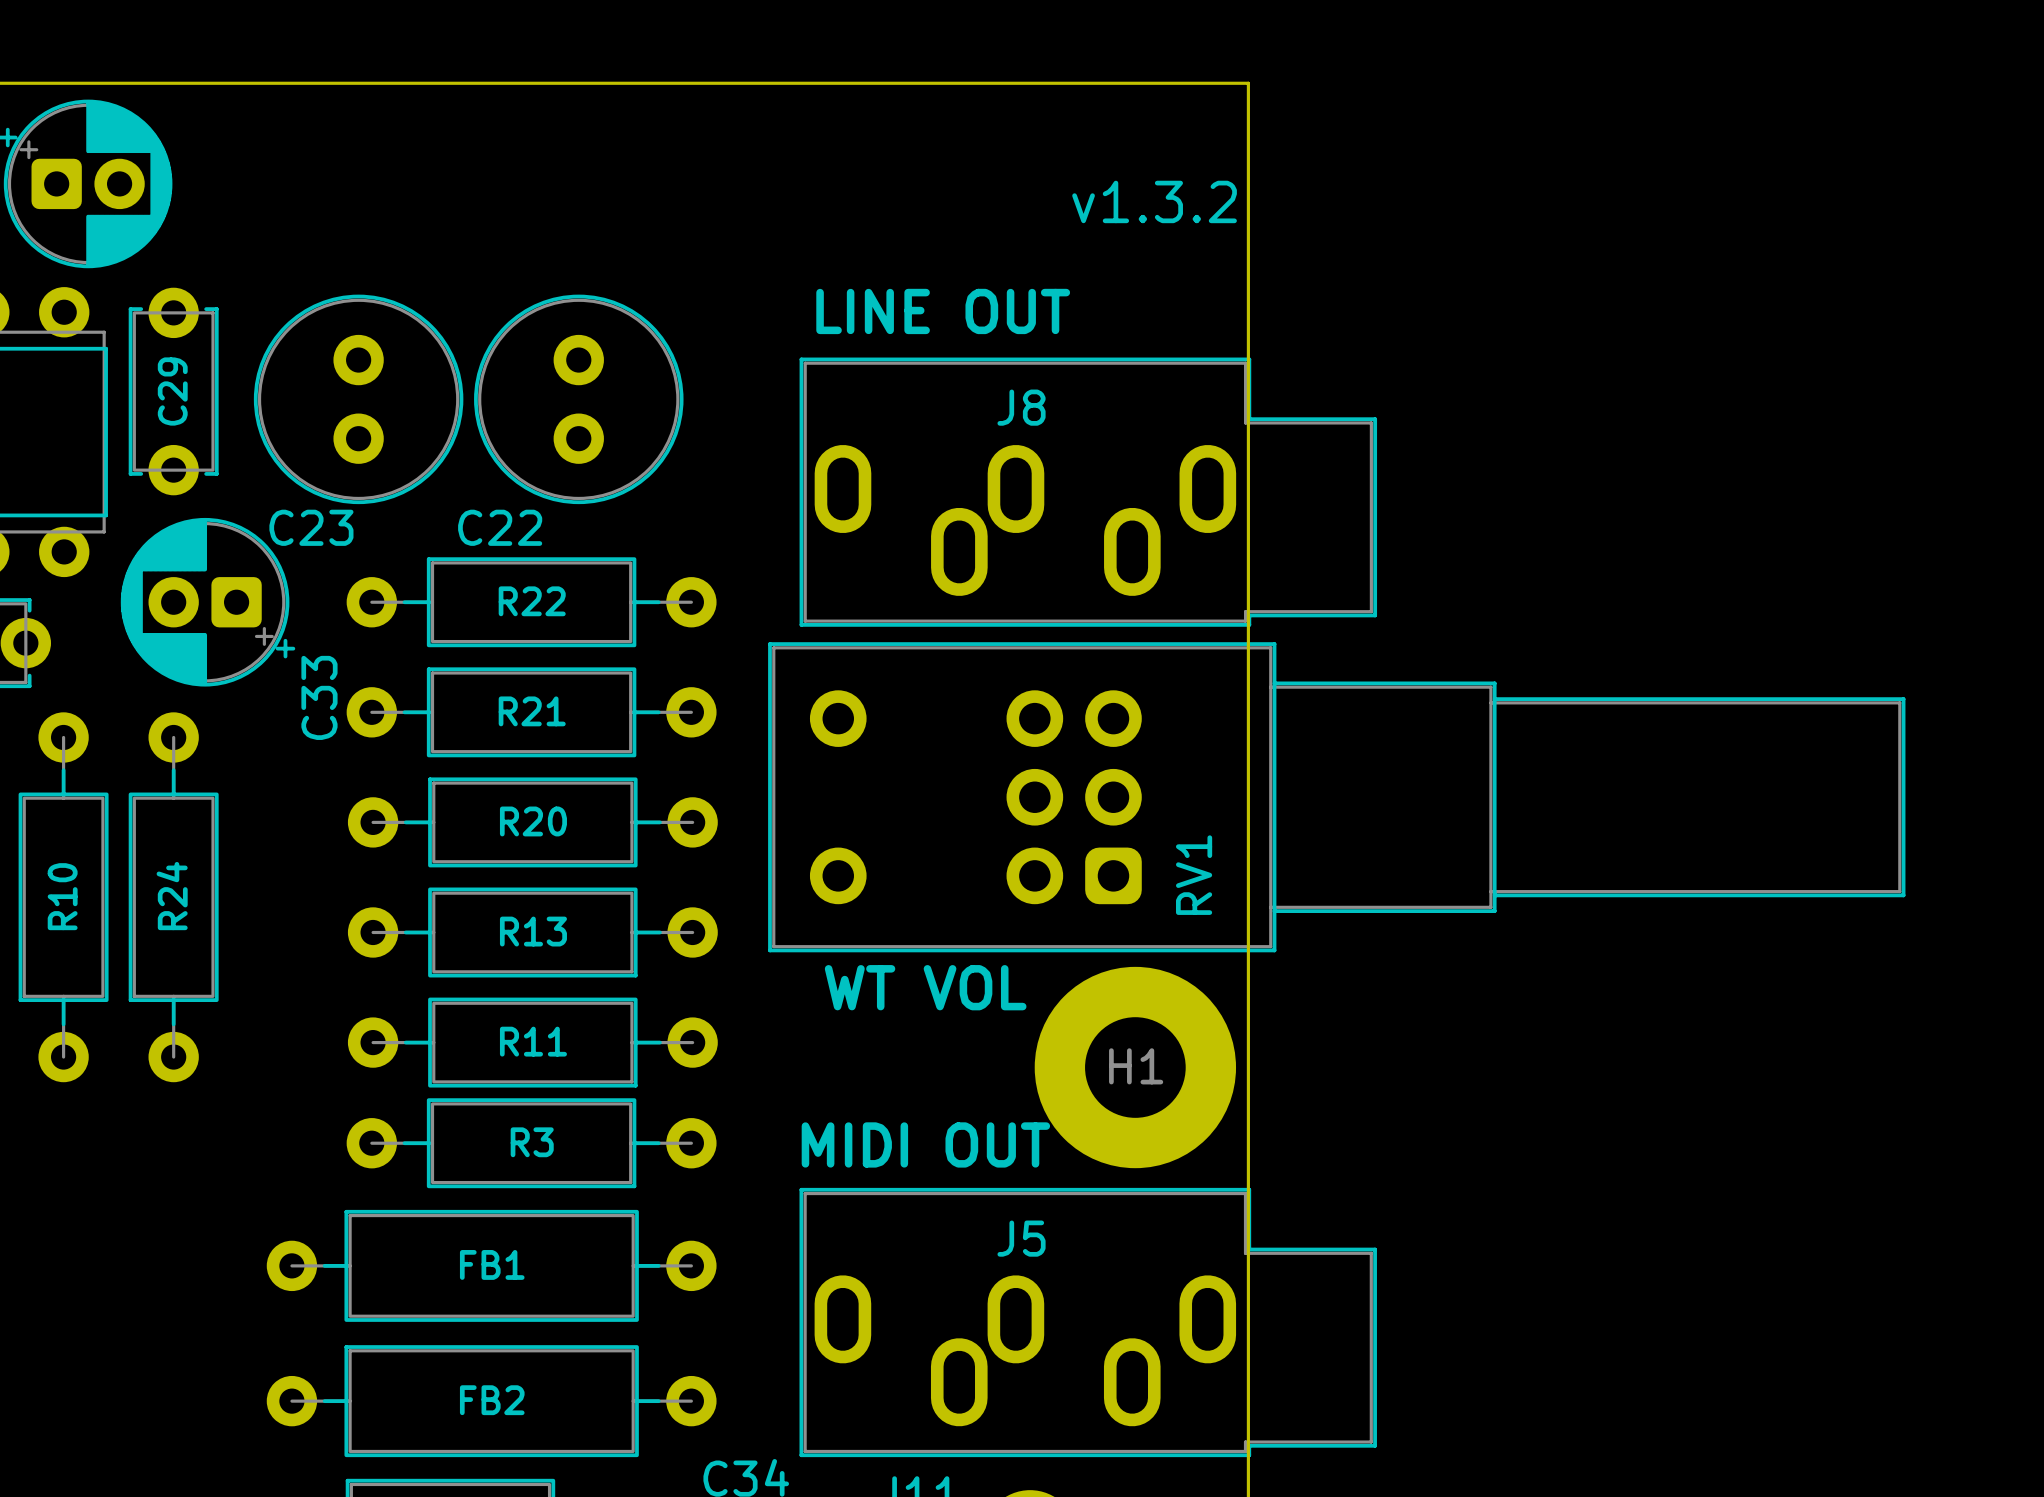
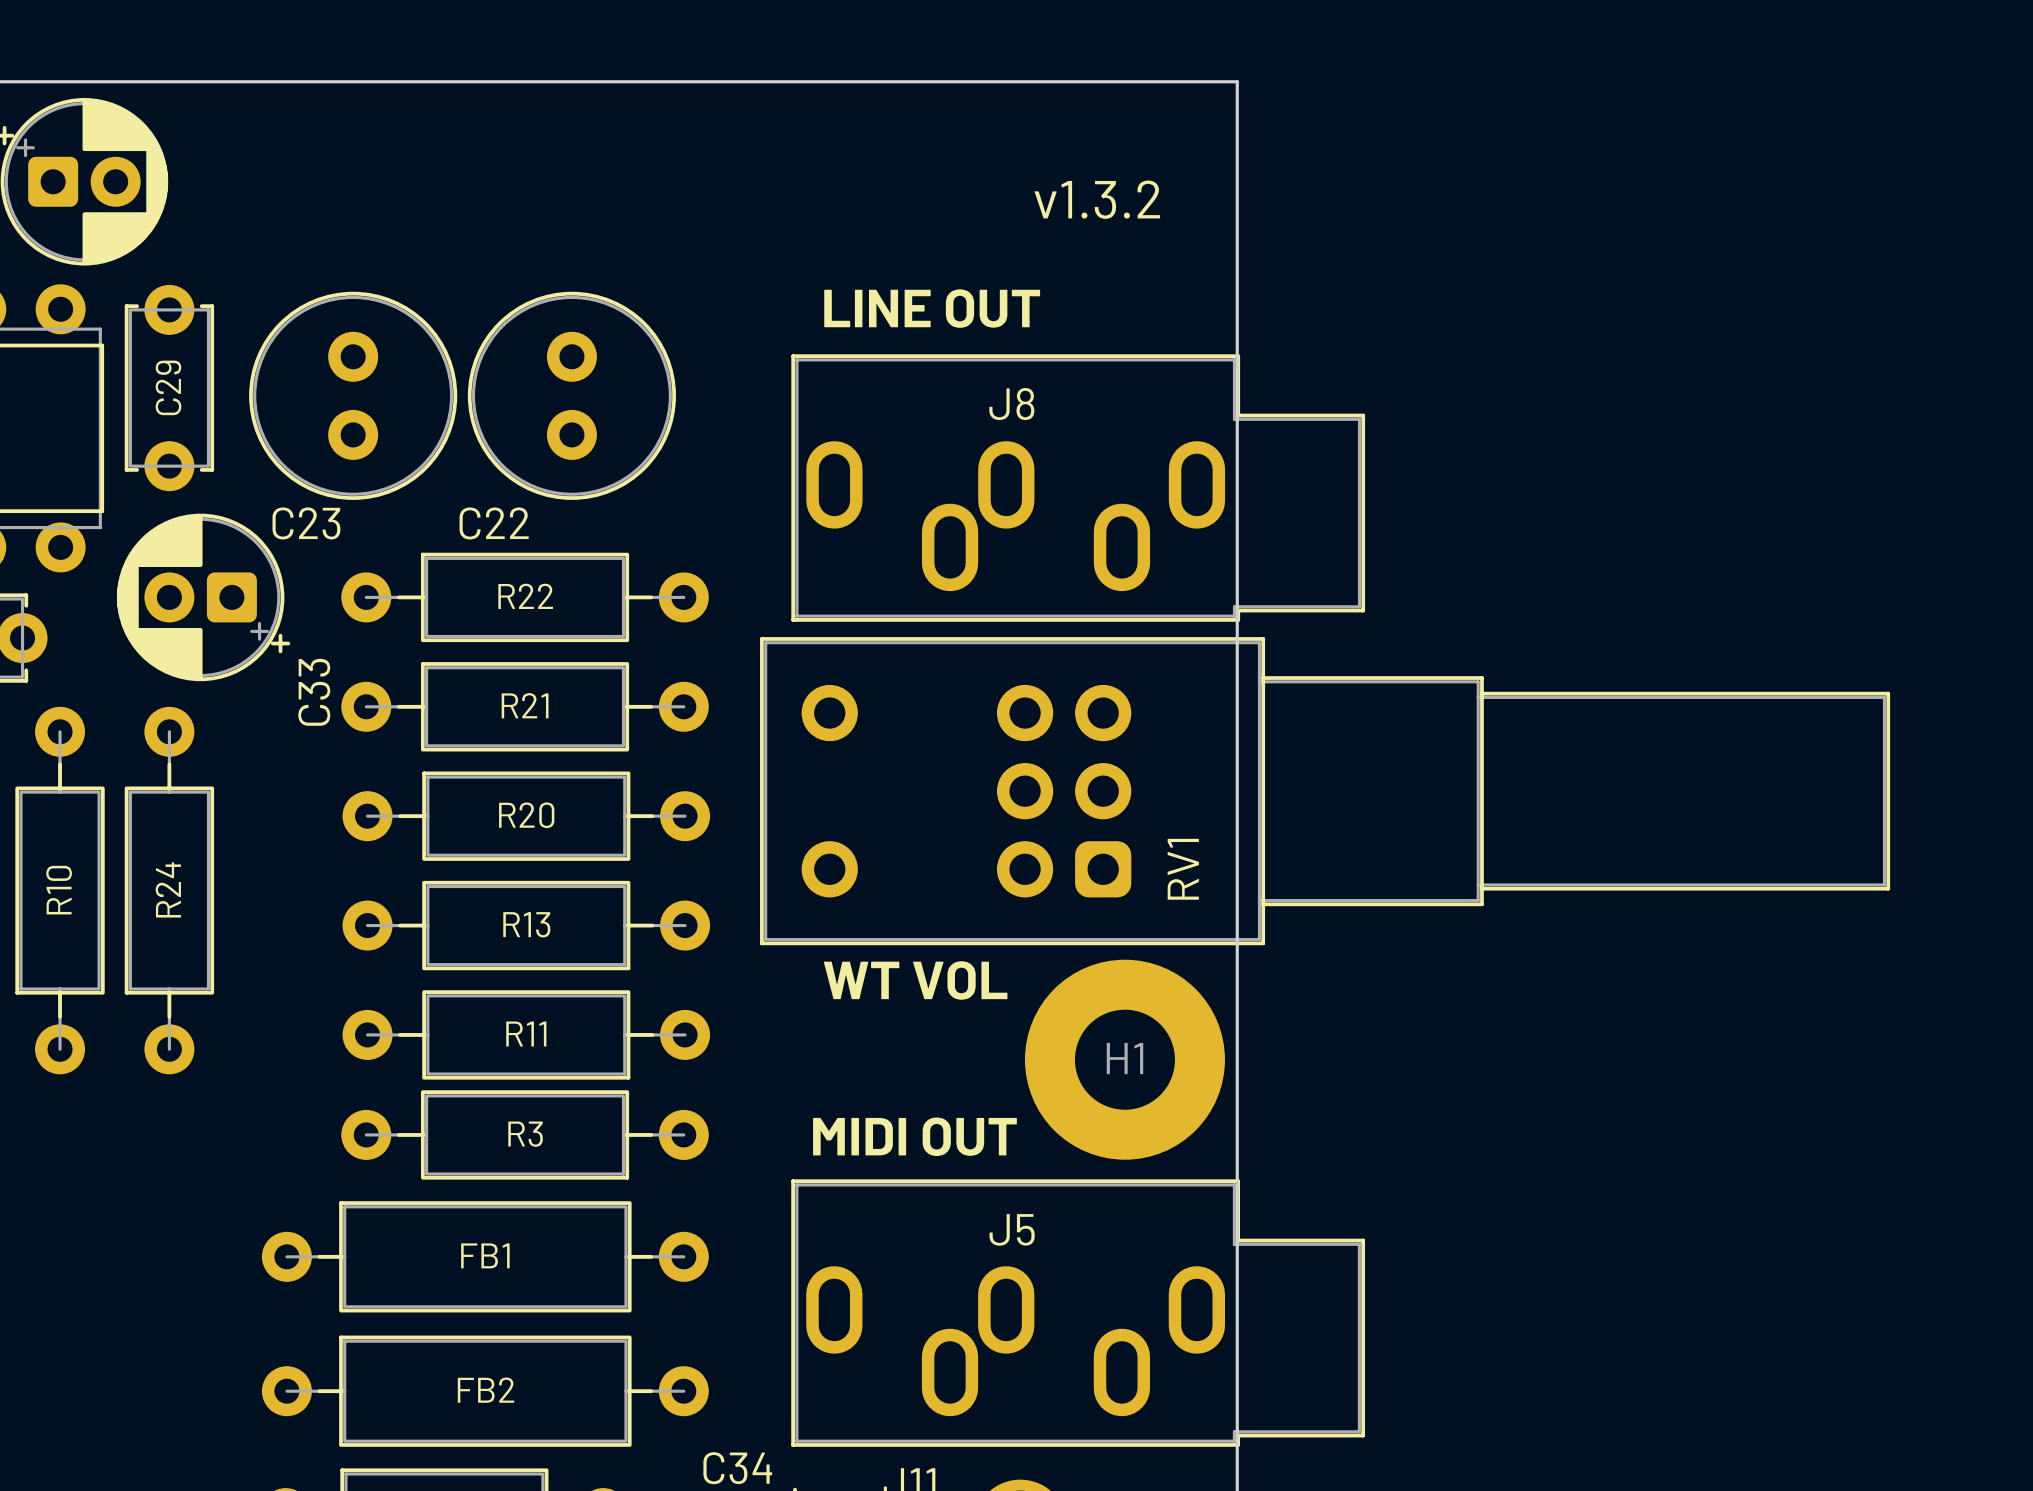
text position: v1.3.2 (1154, 201) -> v1.3.2 (1097, 199)

